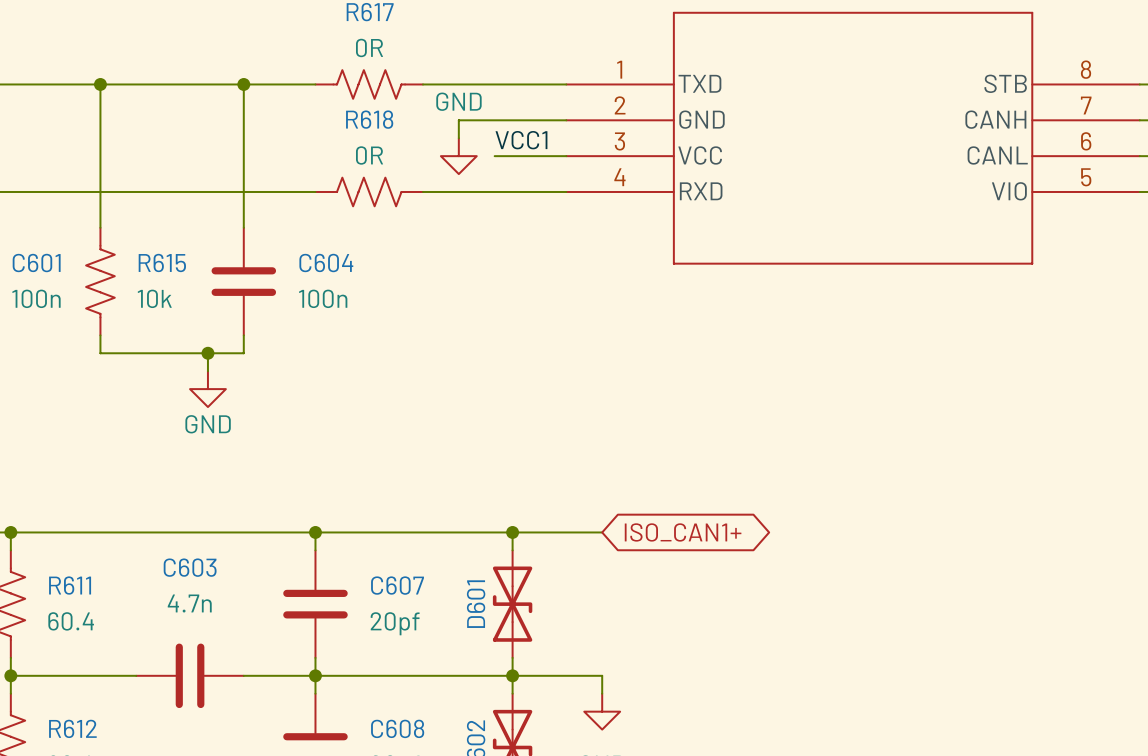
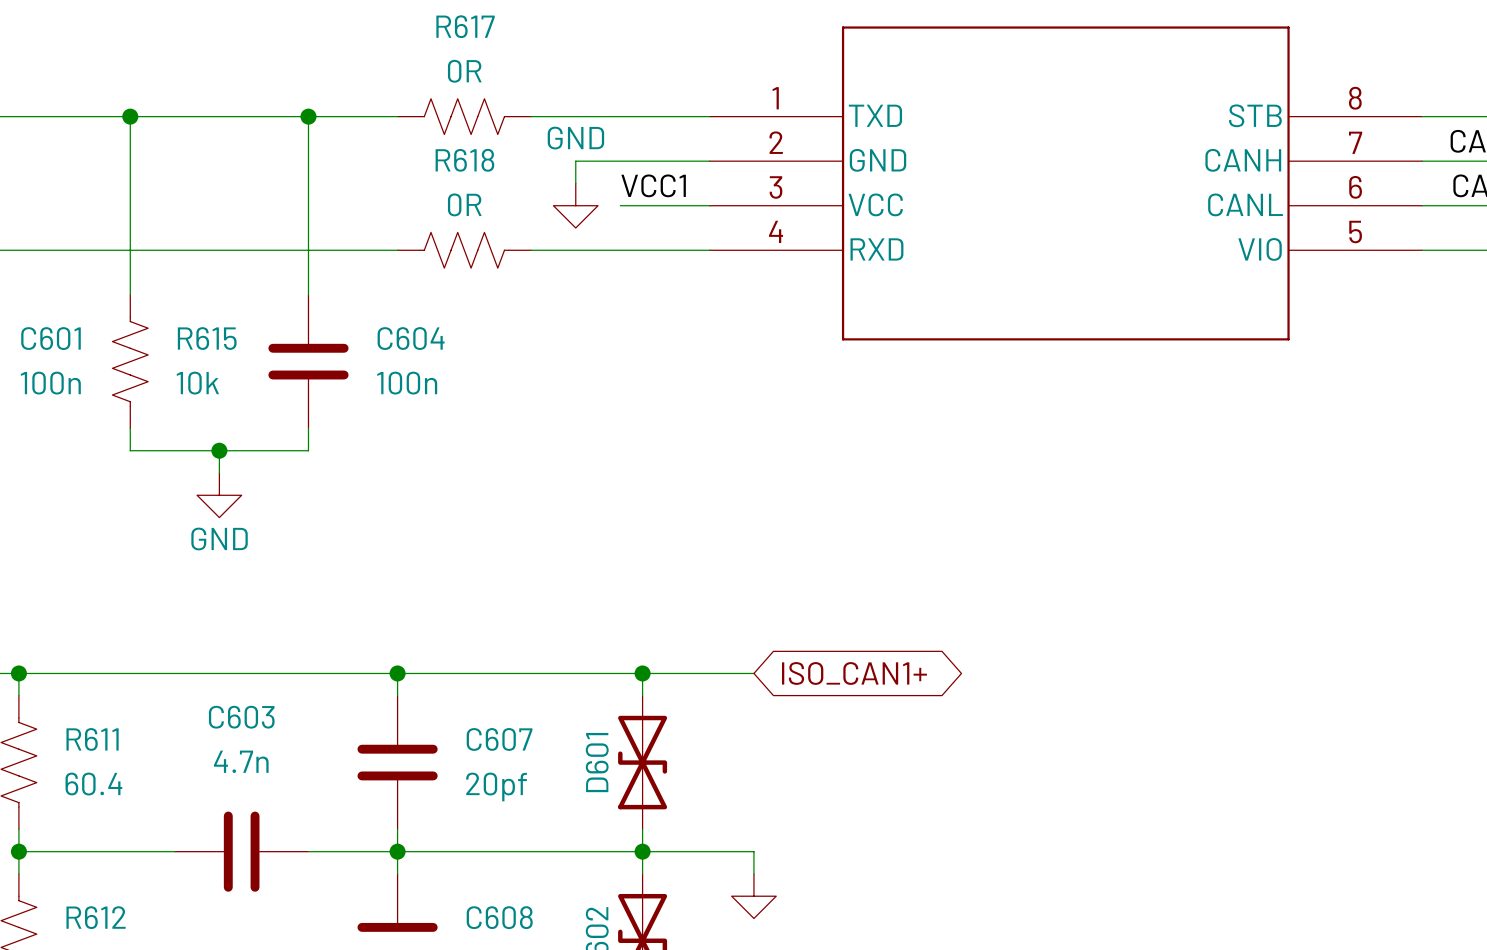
wire: (207, 353) (207, 371) -> (219, 450) (219, 473)
junction position: (207, 353) -> (219, 450)
power symbol position: GND (207, 389) -> GND (219, 495)

